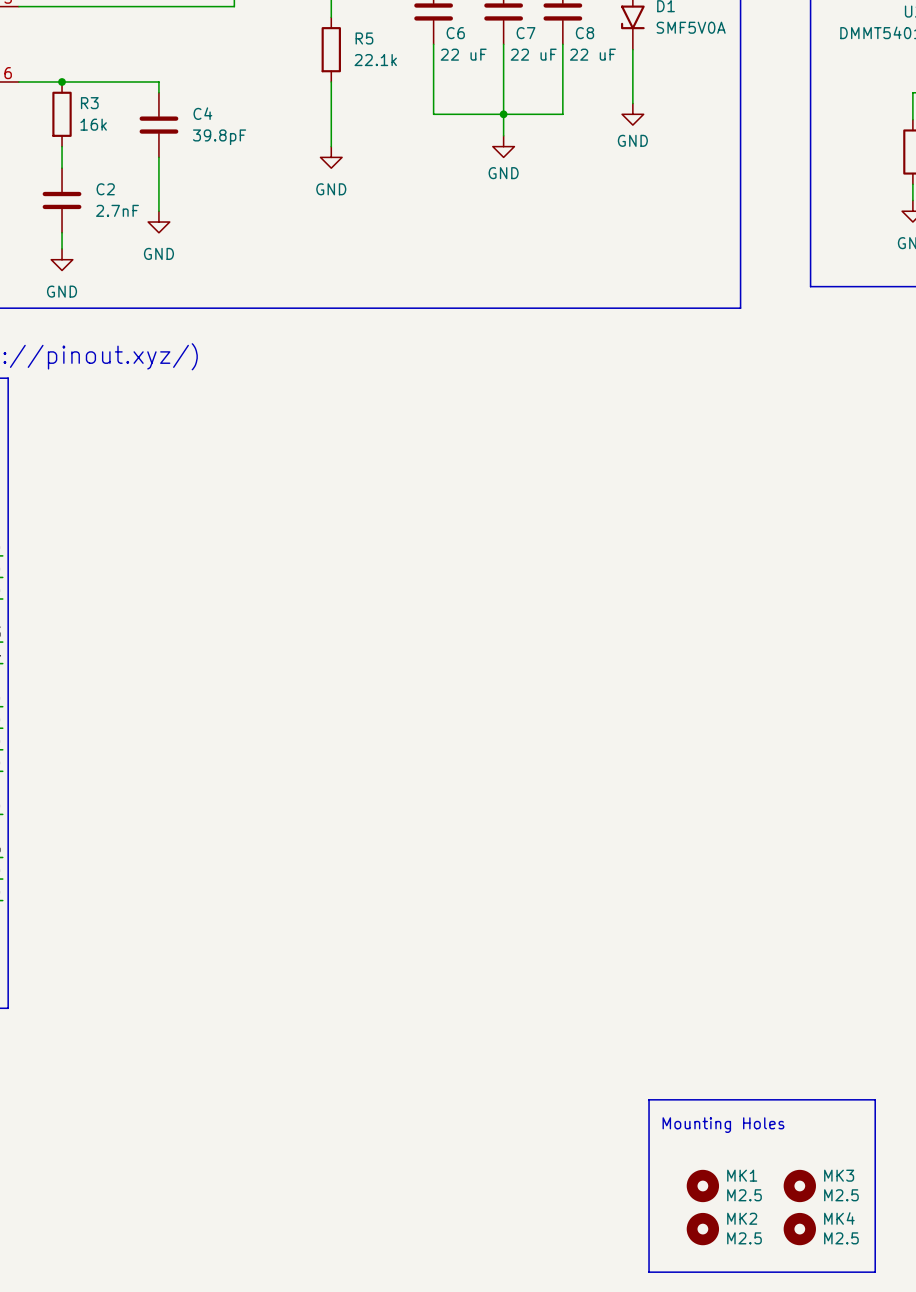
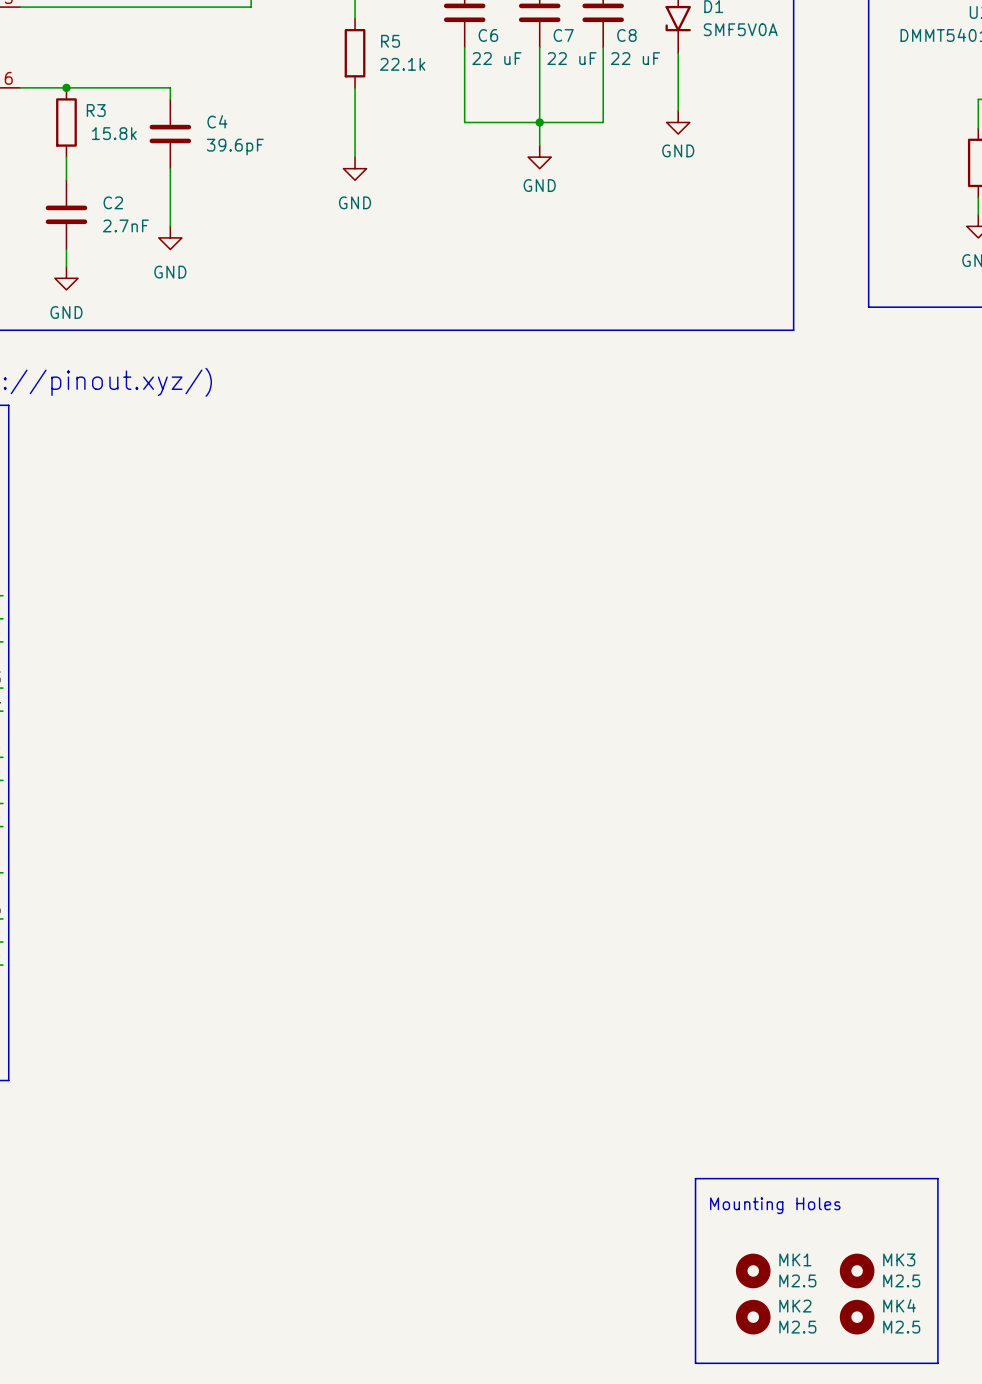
R3 value: 16k (93, 124) -> 15.8k (114, 133)
C4 value: 39.8pF (219, 137) -> 39.6pF (235, 147)

